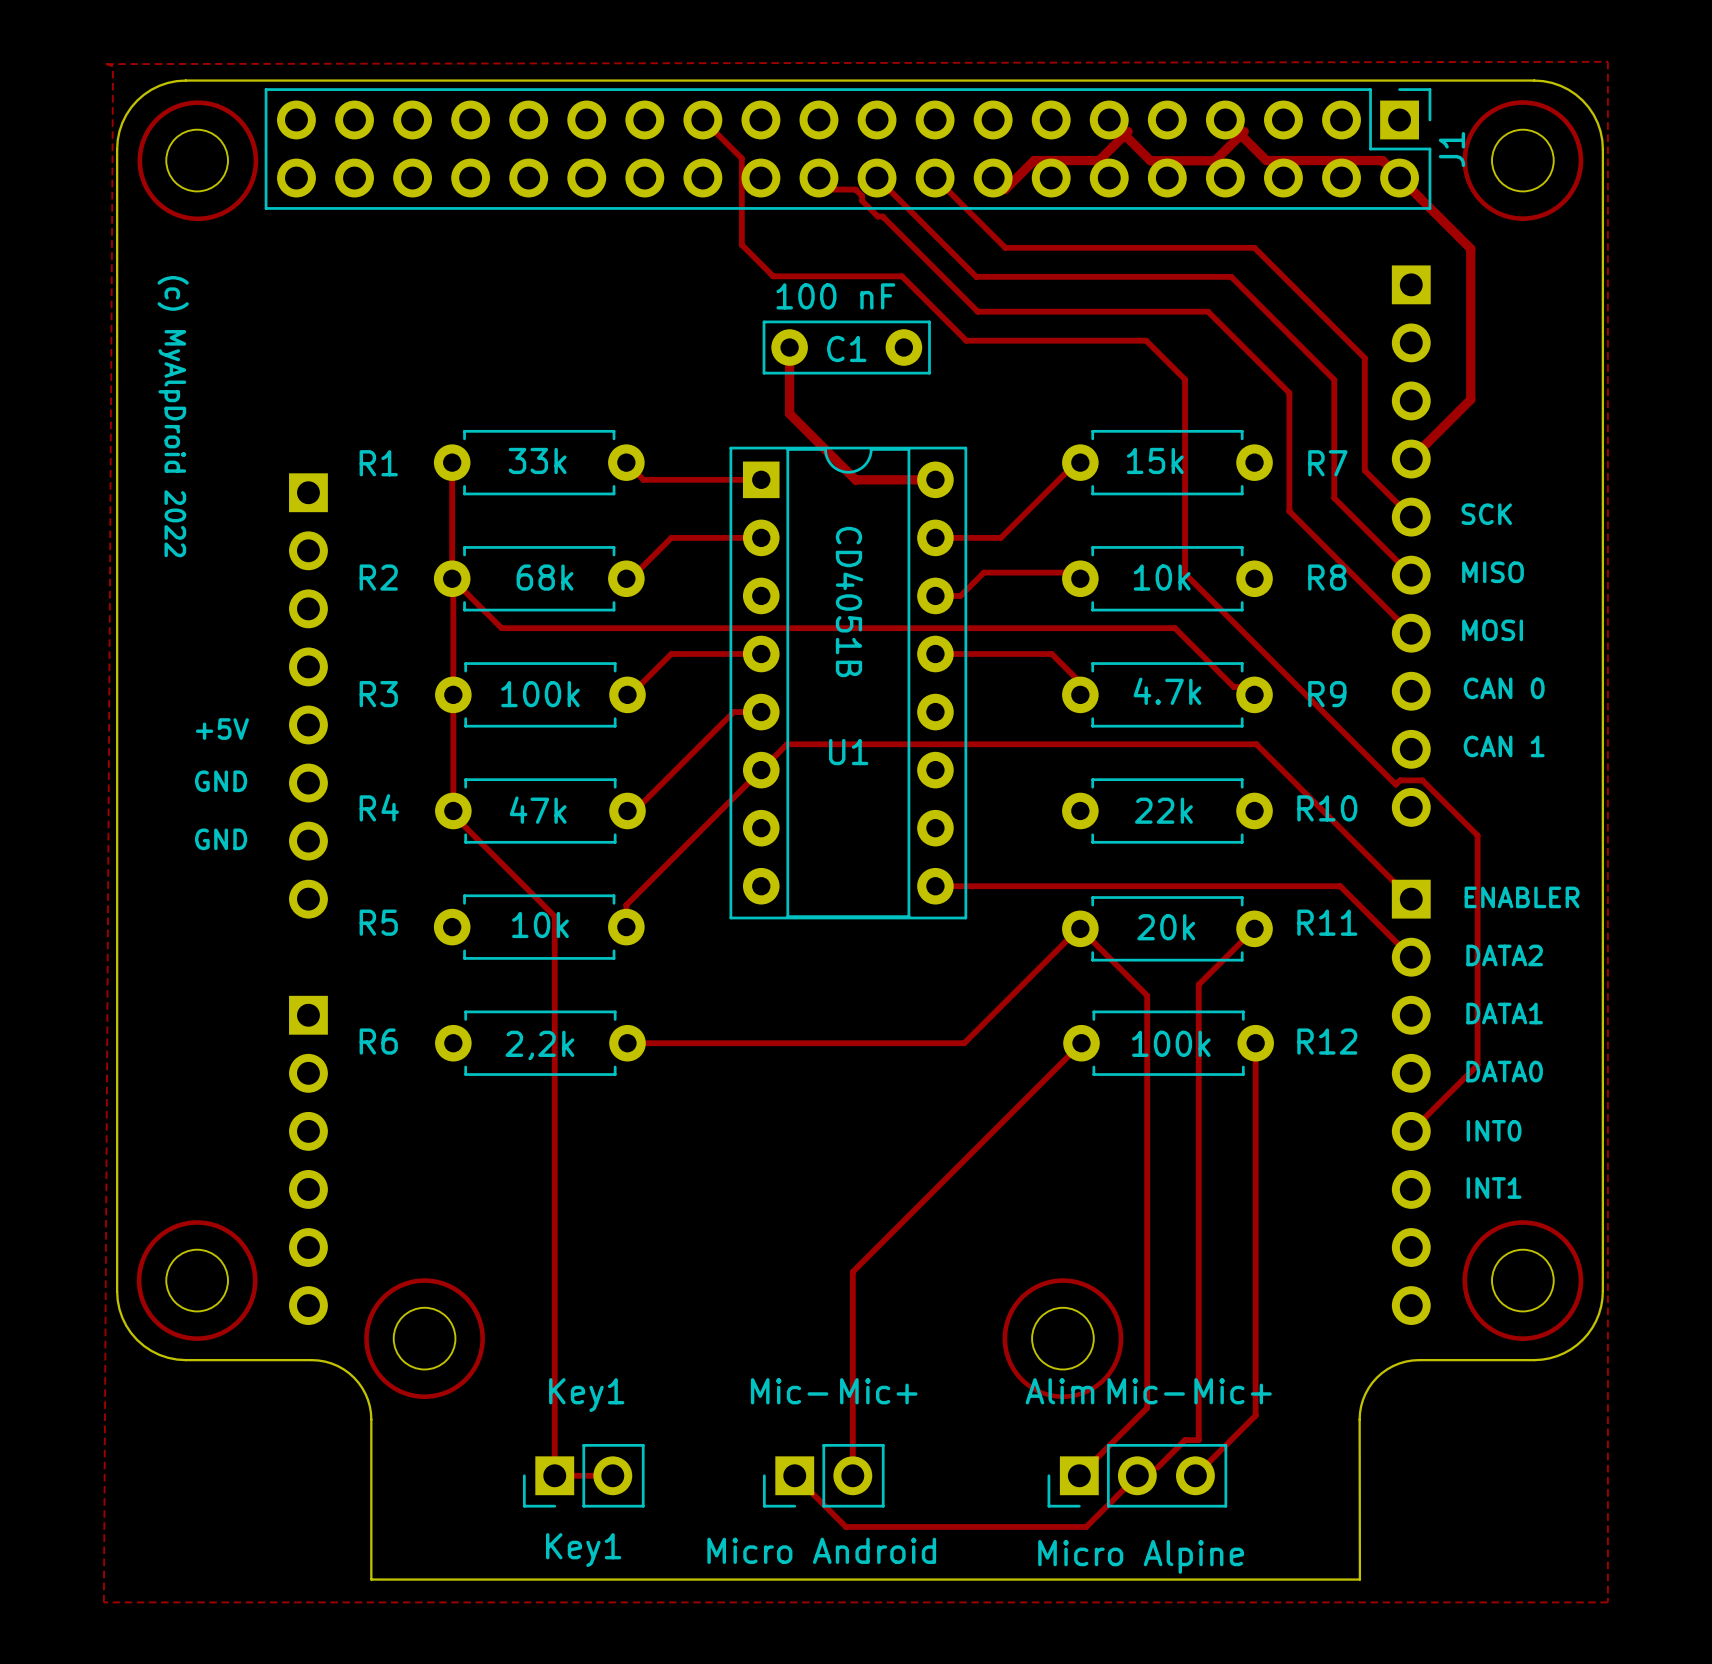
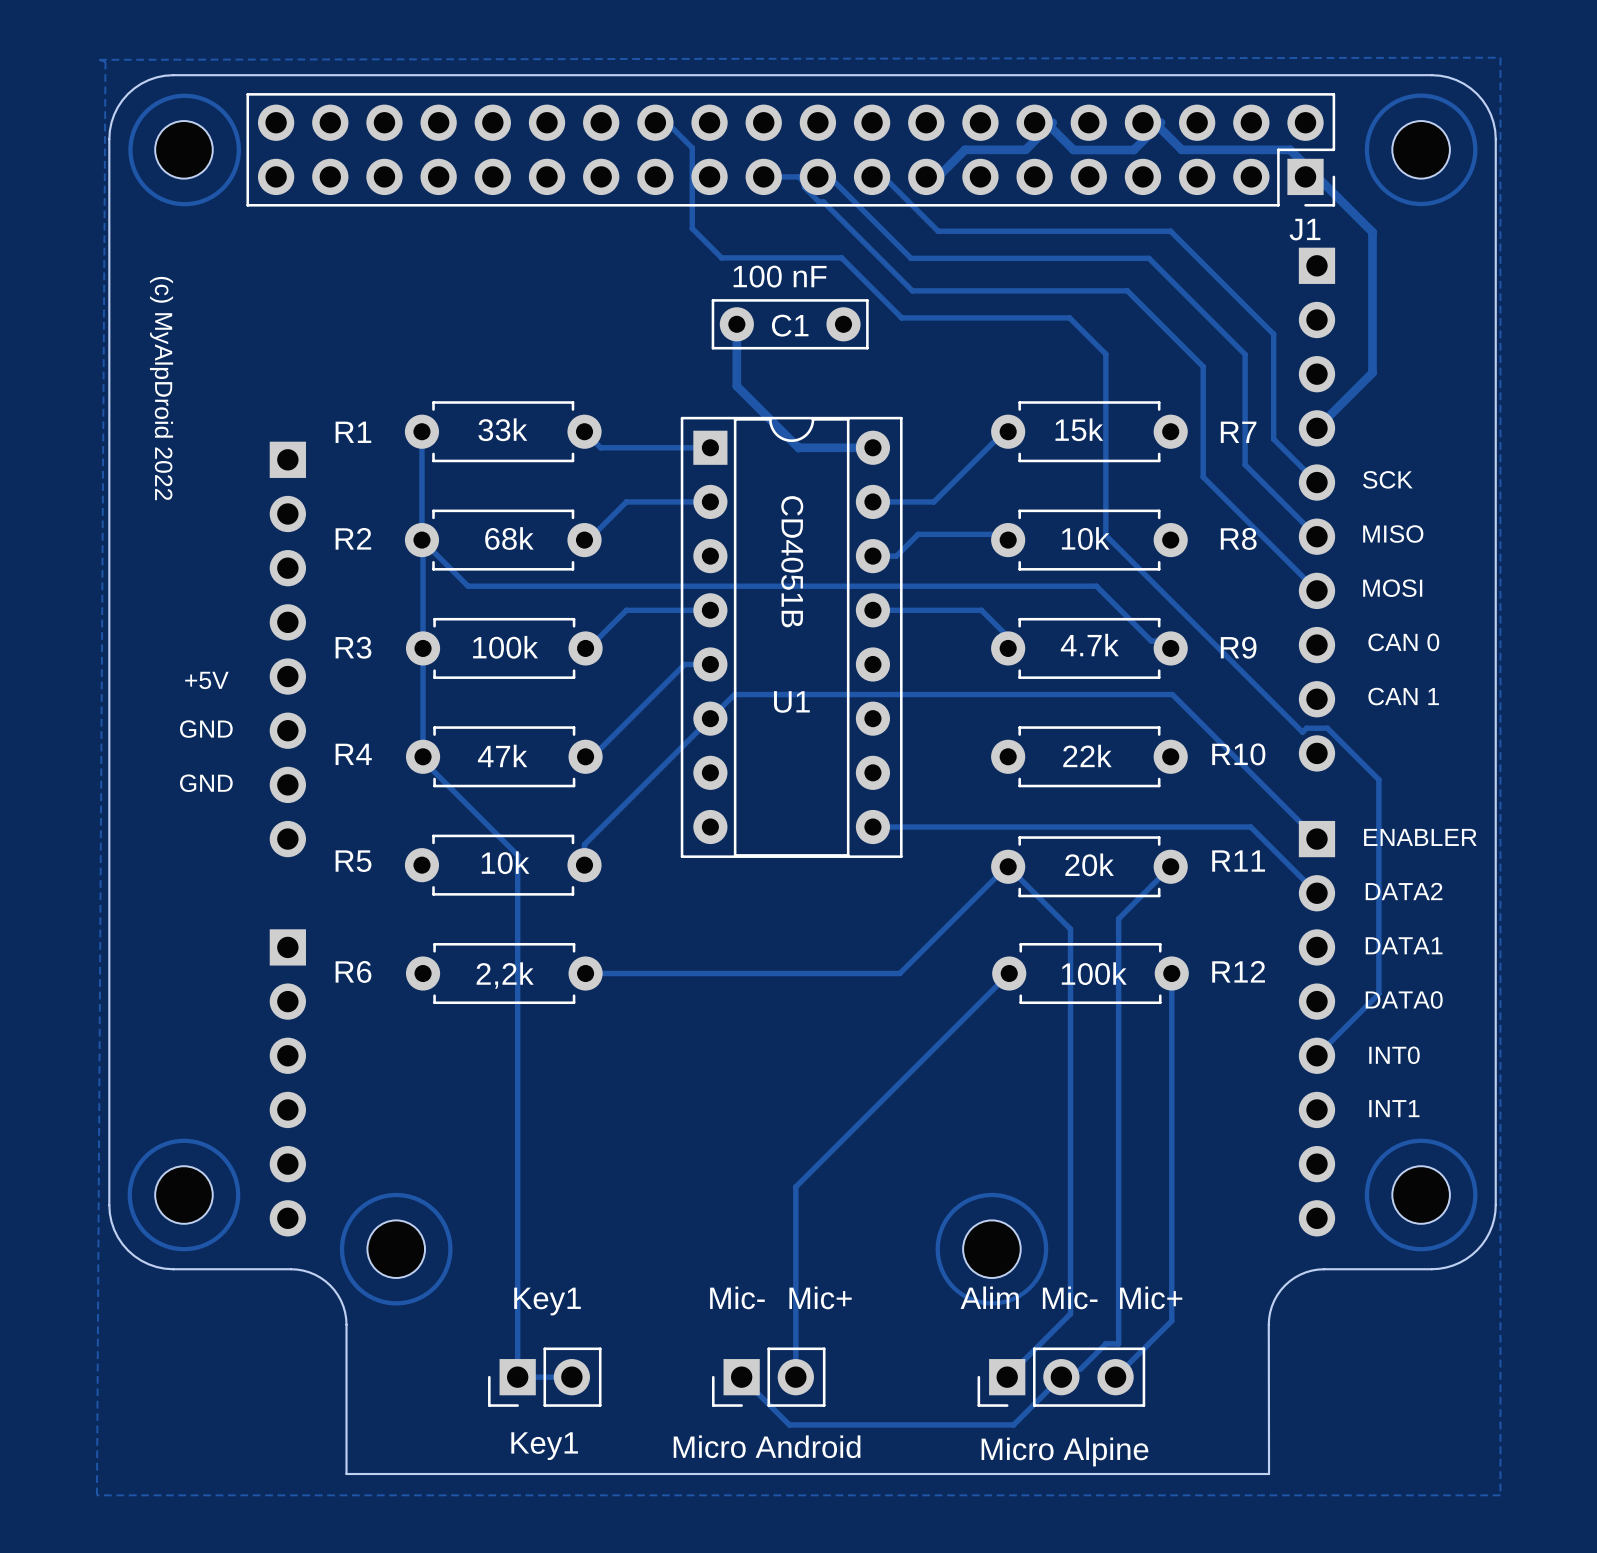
J1 footprint: [264, 88, 1432, 210] -> [246, 93, 1336, 207]
J1 name position: J1 (1451, 149) -> J1 (1305, 229)

